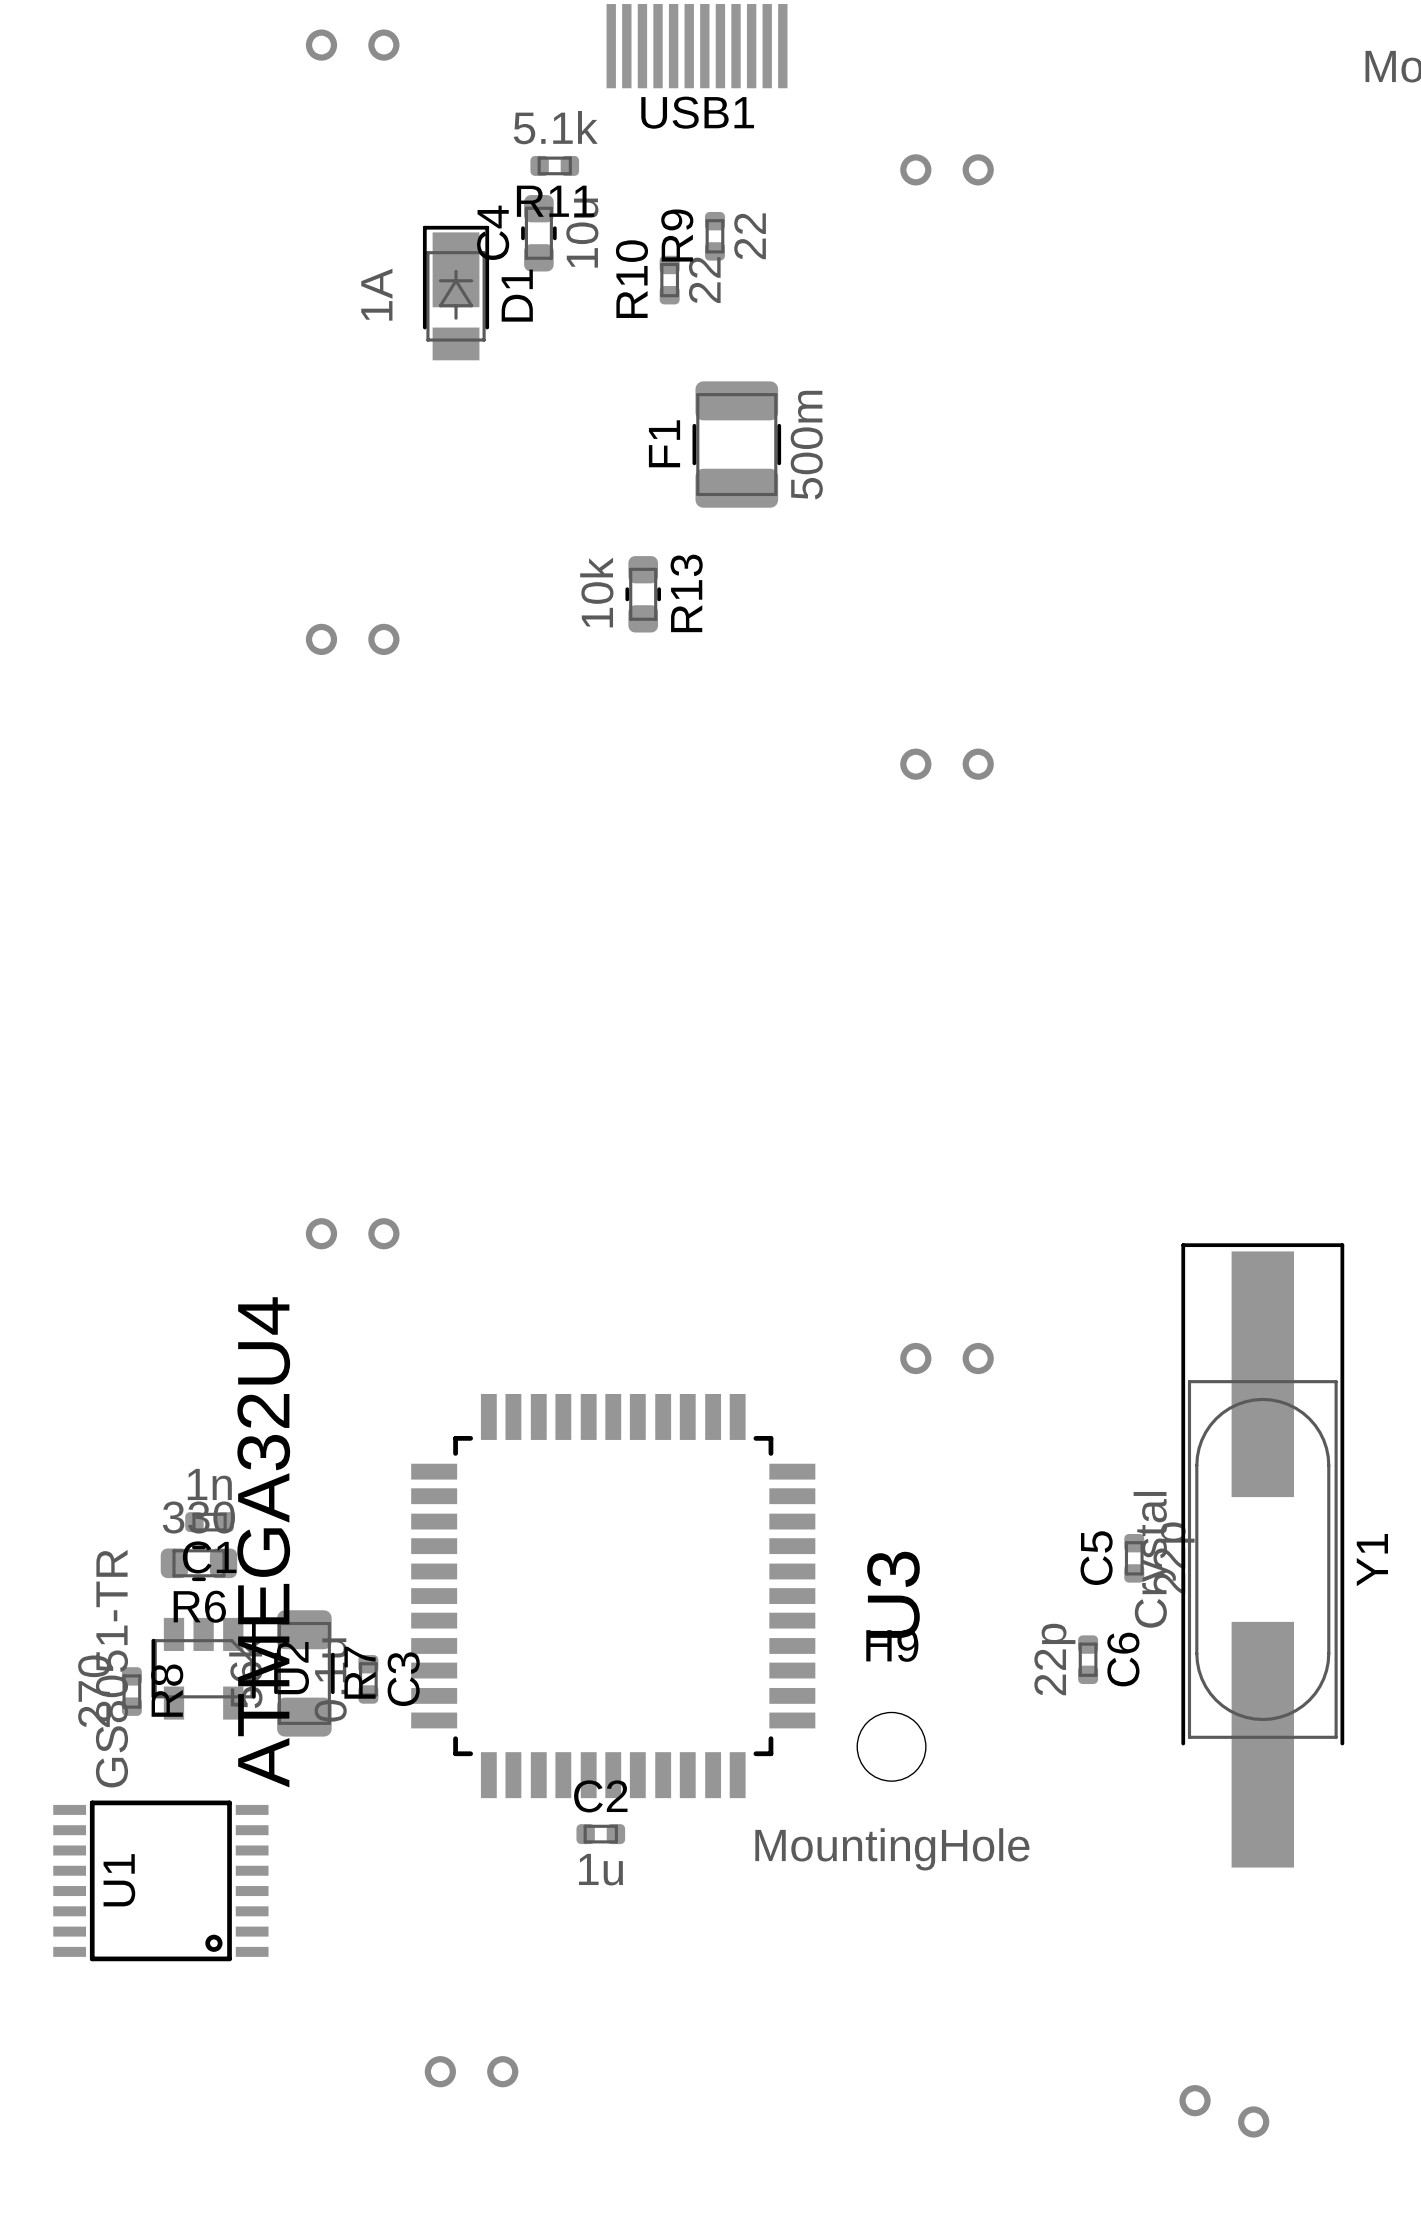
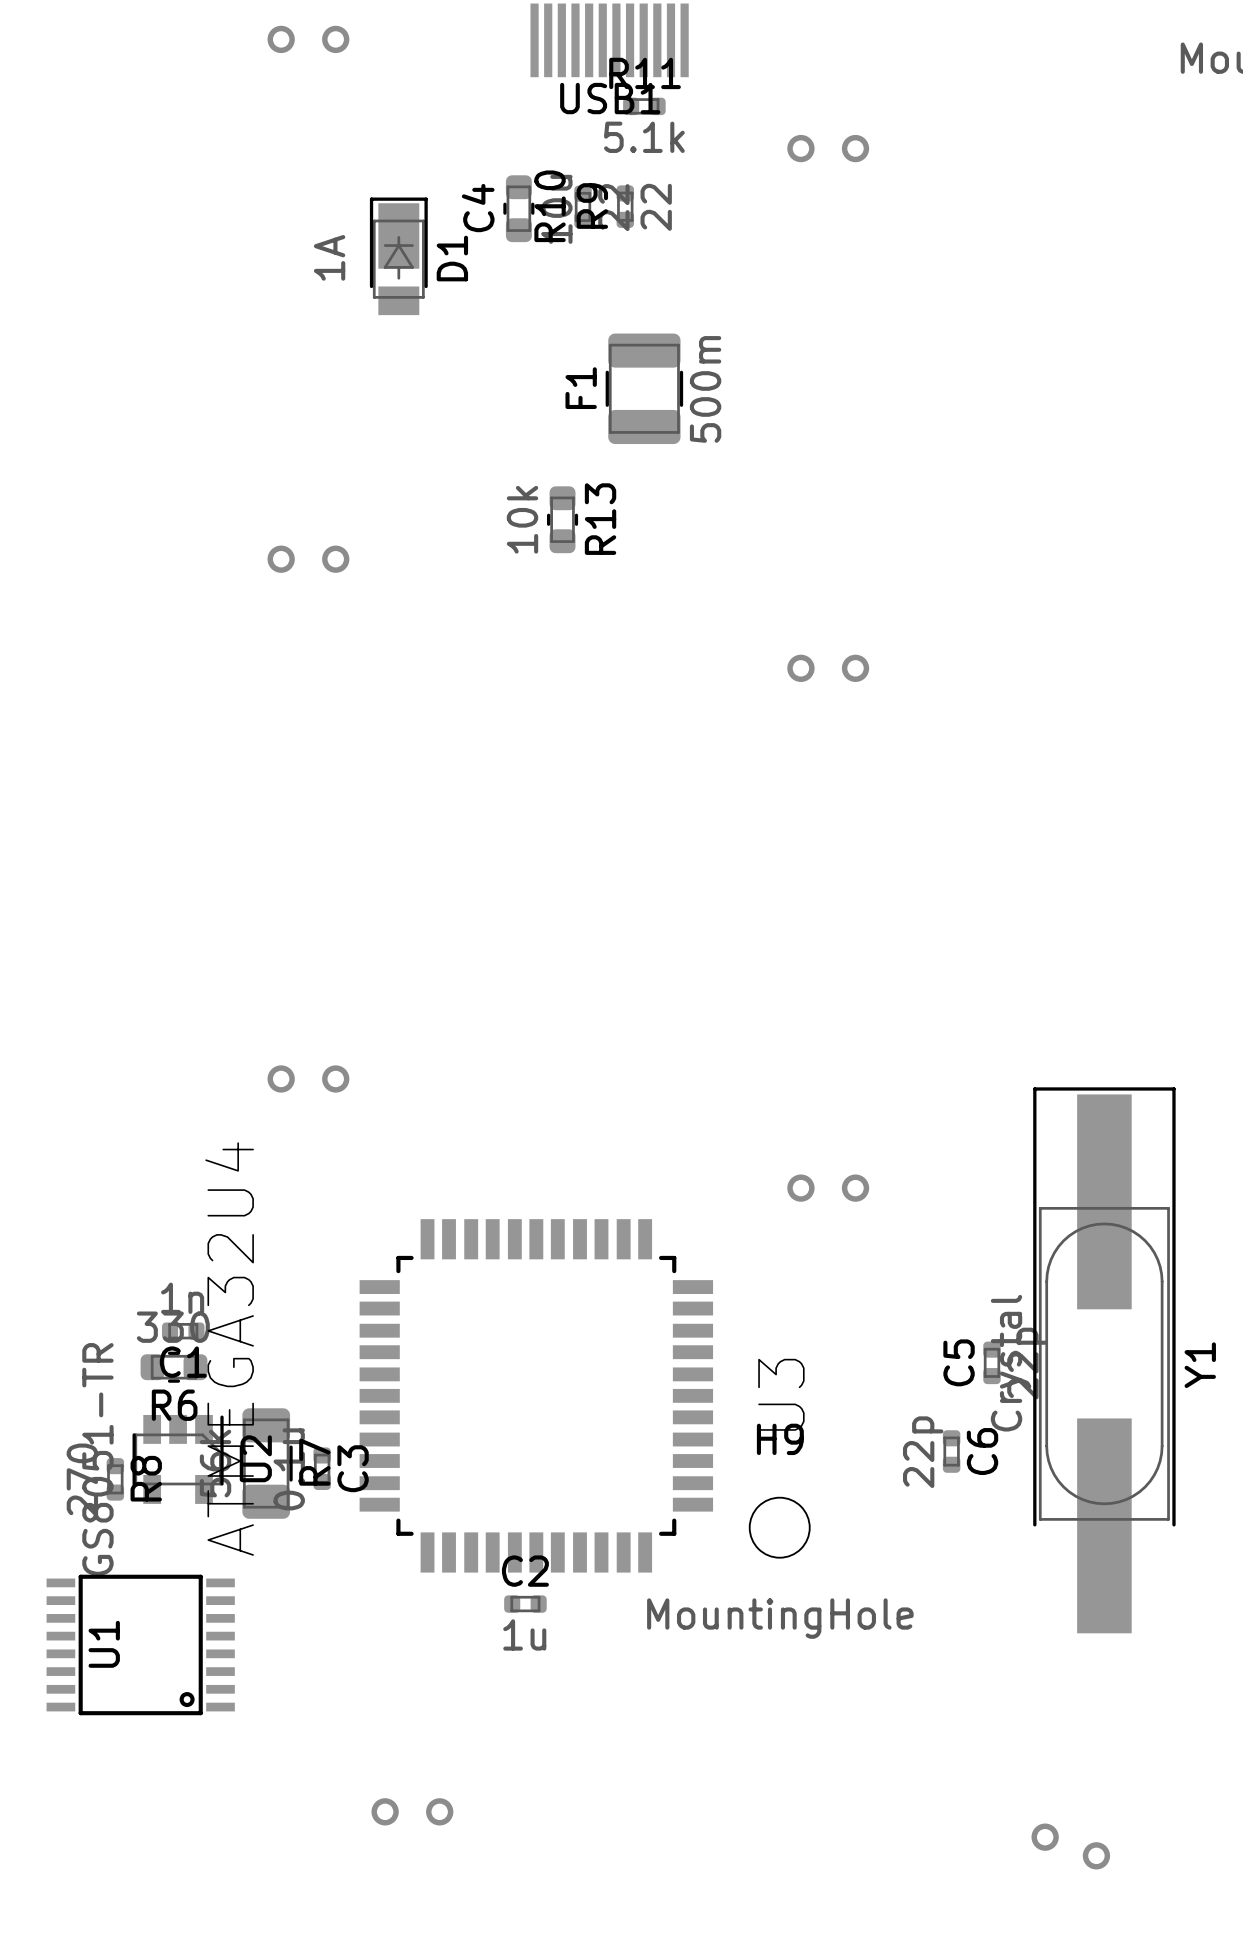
R11 value position: 5.1k (555, 127) -> 5.1k (644, 137)
R11 position: (554, 165) -> (644, 106)
R11 name position: R11 (555, 201) -> R11 (645, 73)
C4 position: (538, 233) -> (518, 208)
R10 position: (669, 280) -> (582, 206)

